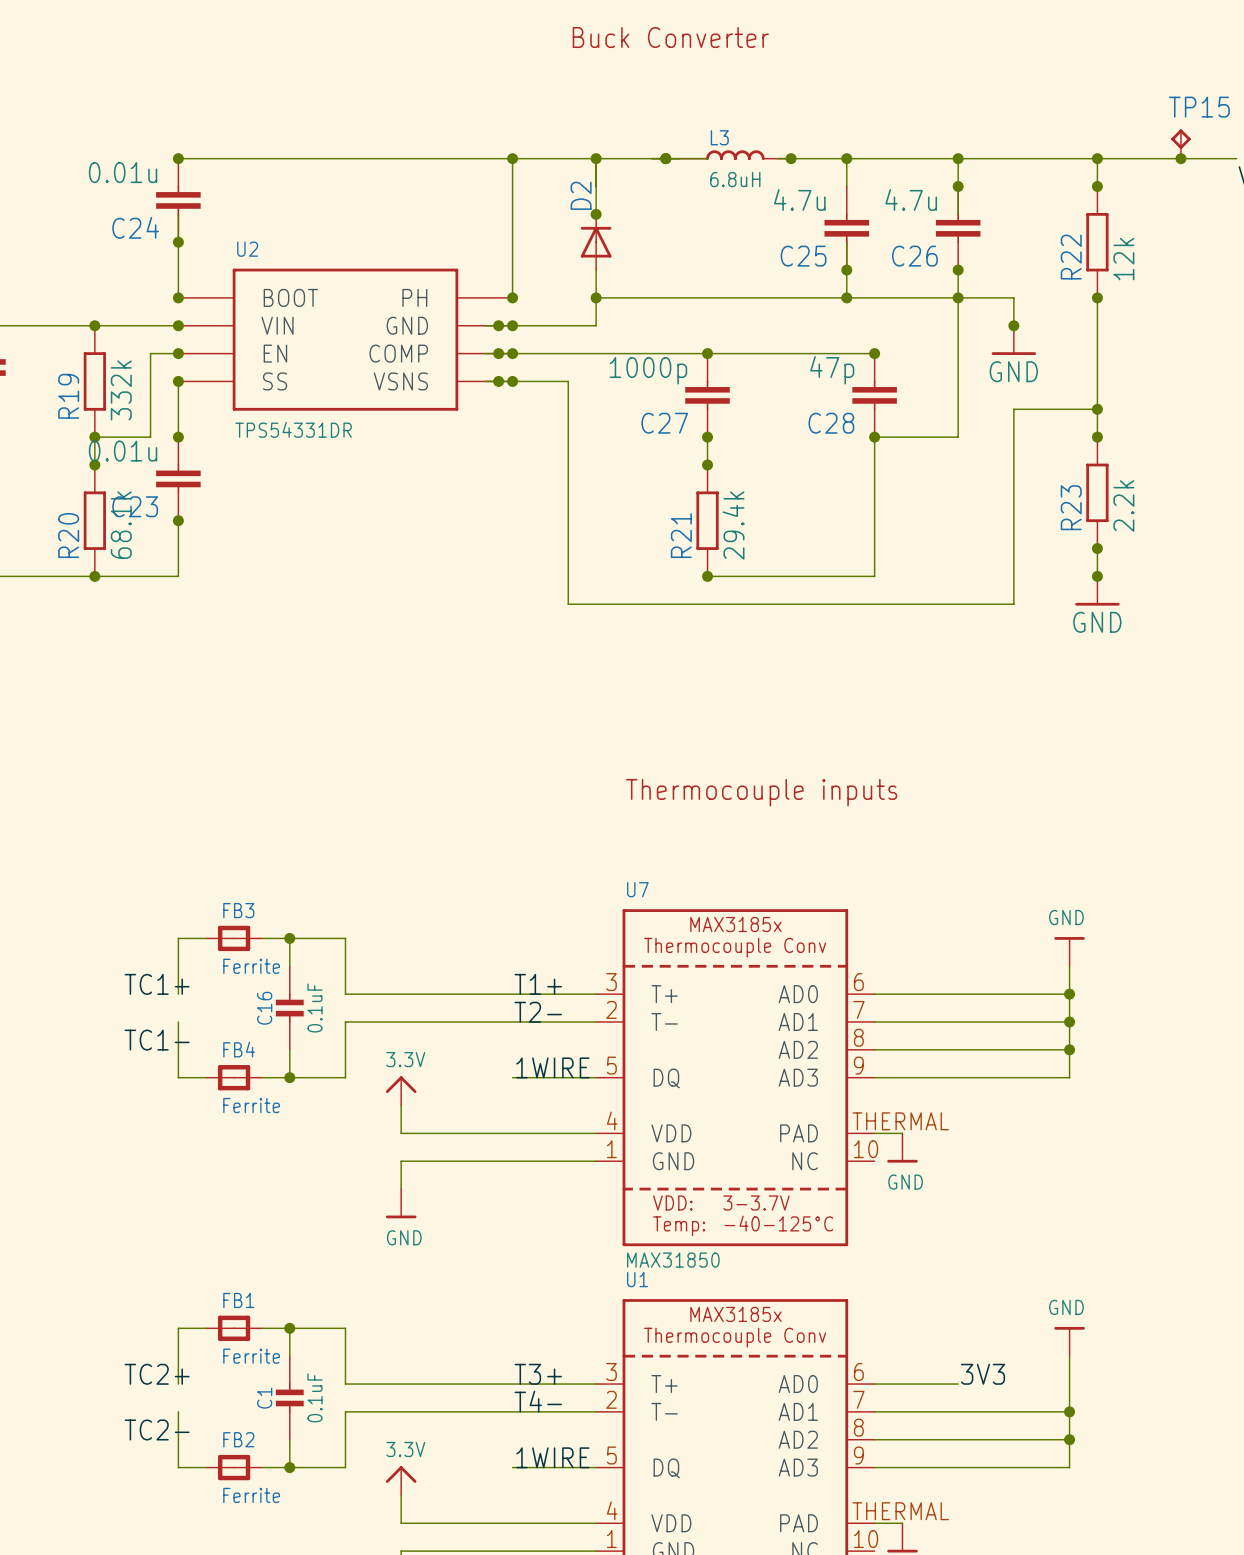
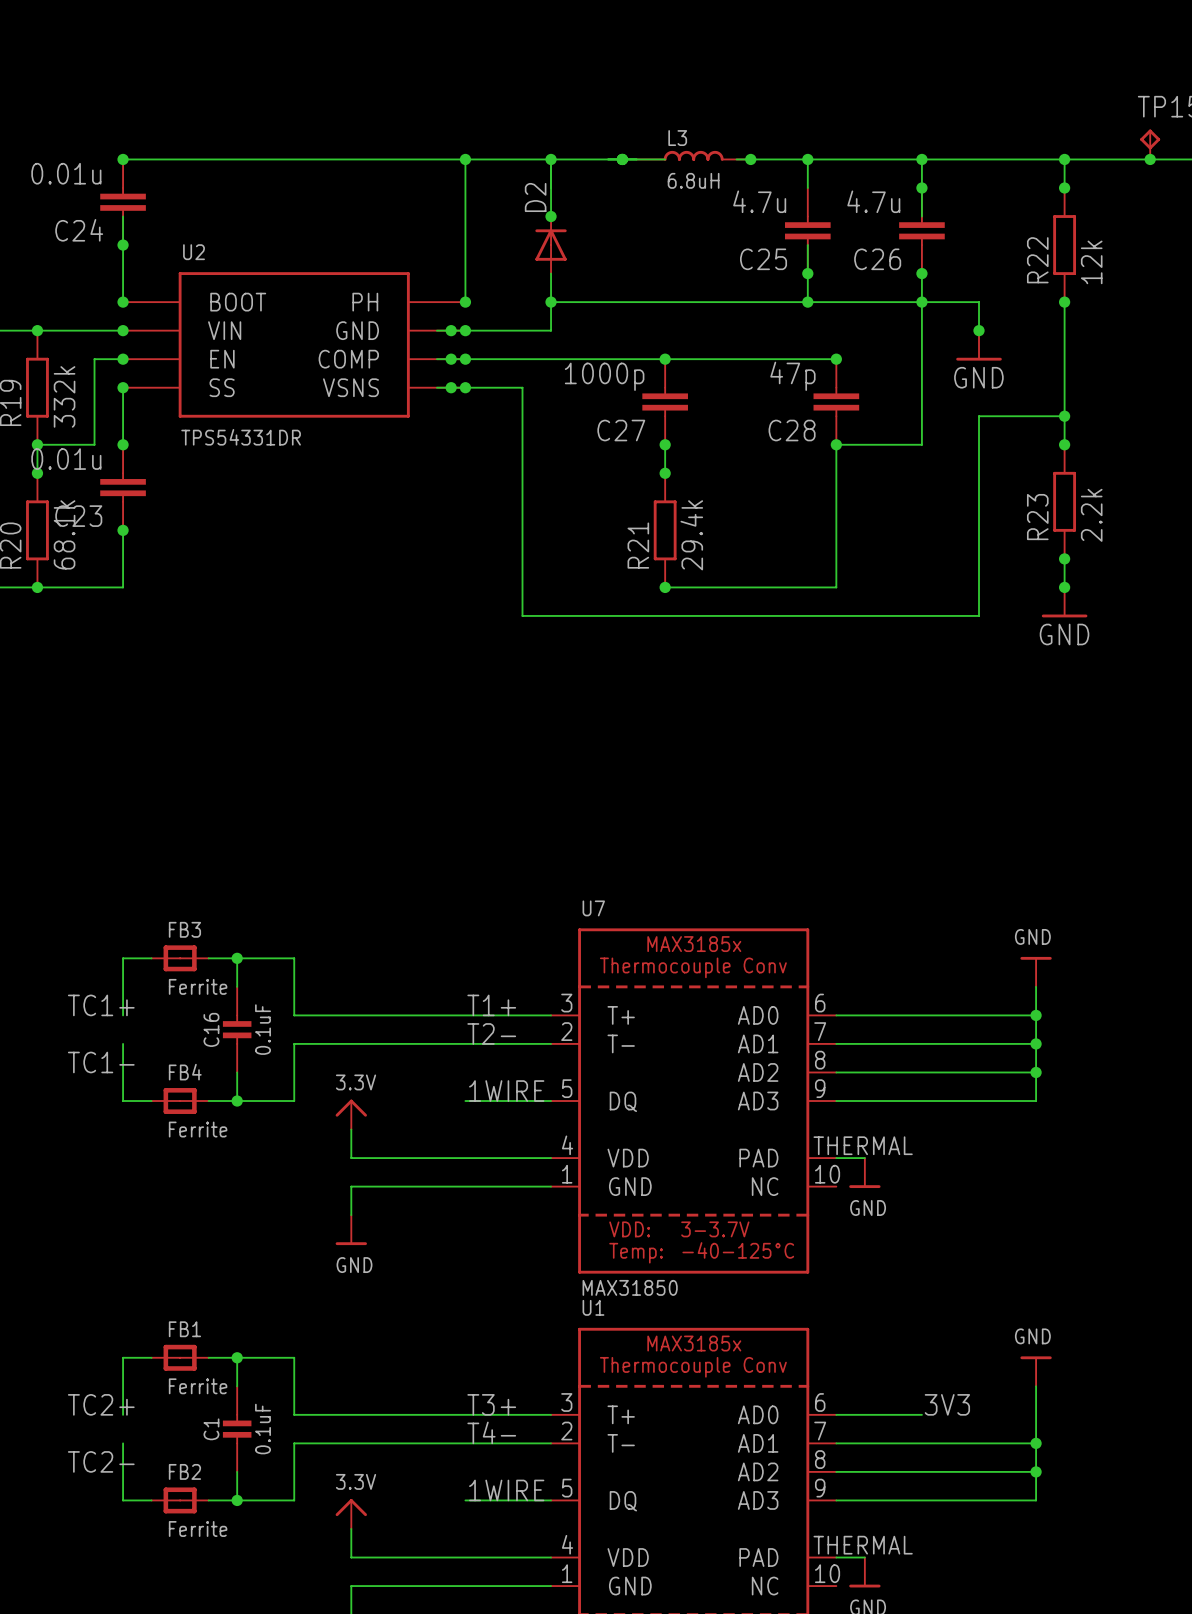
text: Buck Converter (670, 37) -> none
text: Thermocouple inputs (761, 792) -> none

